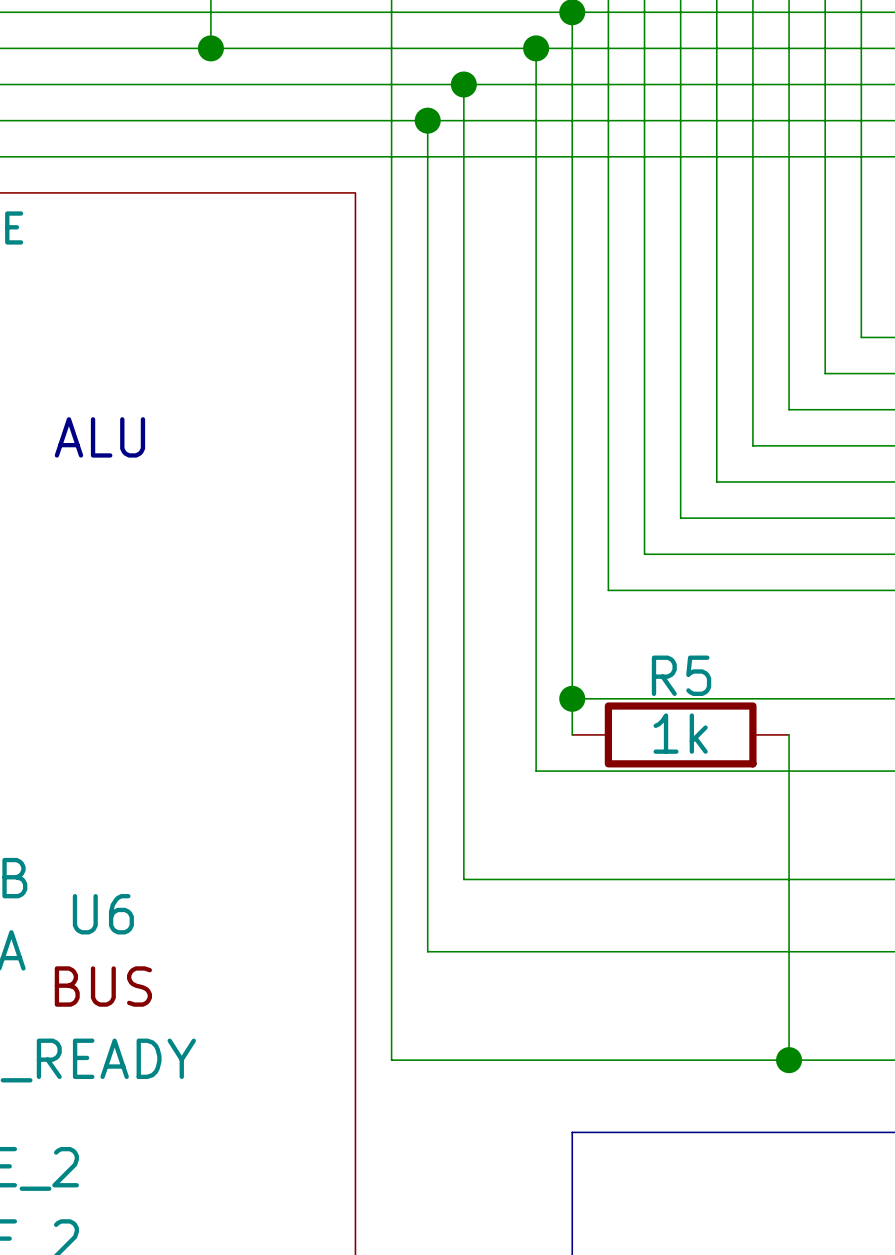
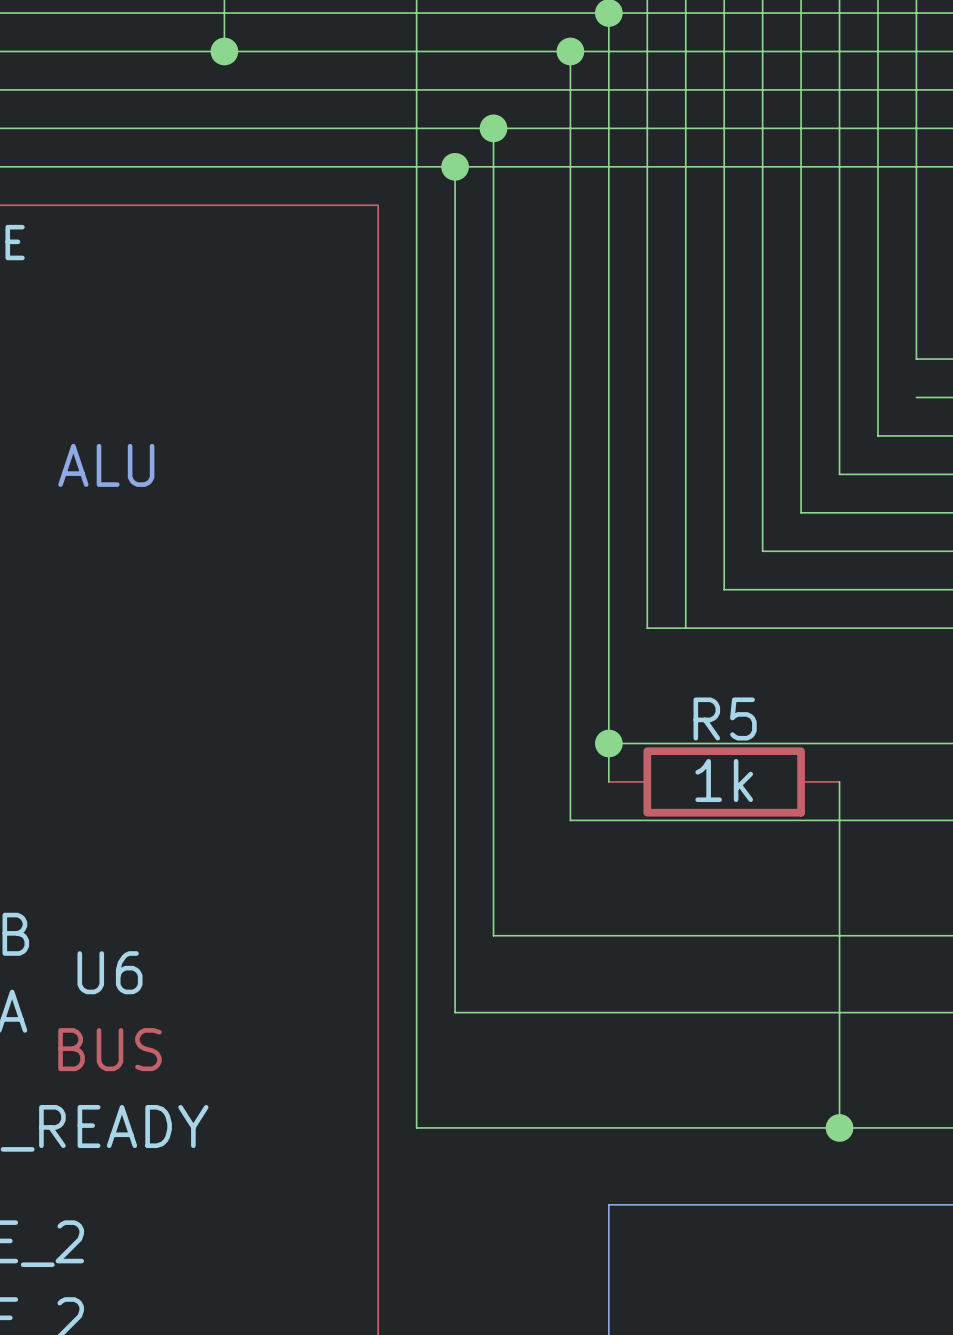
wire: (463, 84) (463, 120) -> none
junction: (463, 84) -> none
wire: (427, 120) (427, 156) -> none
junction: (427, 120) -> none
junction: none -> (493, 128)
junction: none -> (455, 166)
wire: (825, 373) (861, 373) -> (877, 397) (877, 435)
wire: (789, 409) (825, 409) -> (839, 435) (839, 474)
wire: (752, 445) (789, 445) -> (801, 474) (801, 512)
wire: (716, 481) (752, 481) -> (762, 512) (762, 551)
wire: (680, 518) (716, 518) -> (724, 551) (724, 589)
wire: (644, 554) (680, 554) -> (685, 589) (685, 628)

